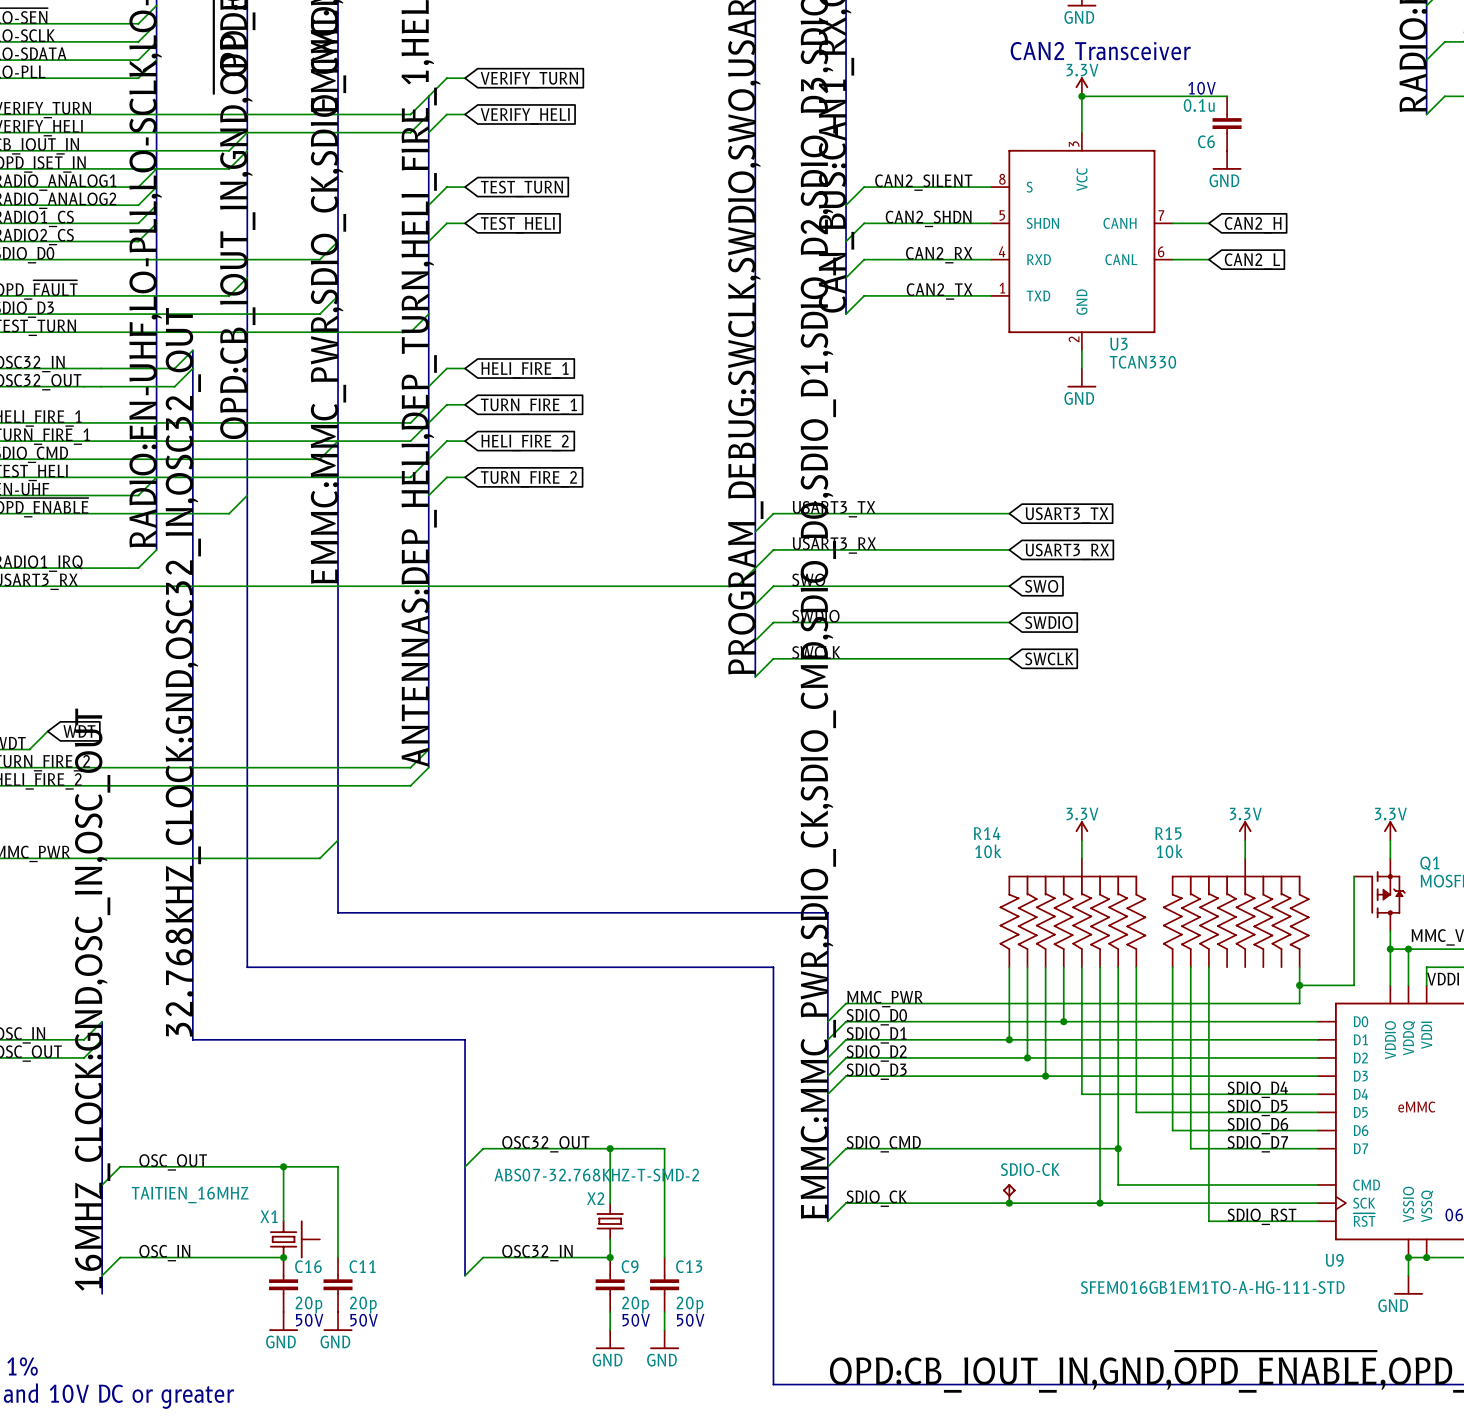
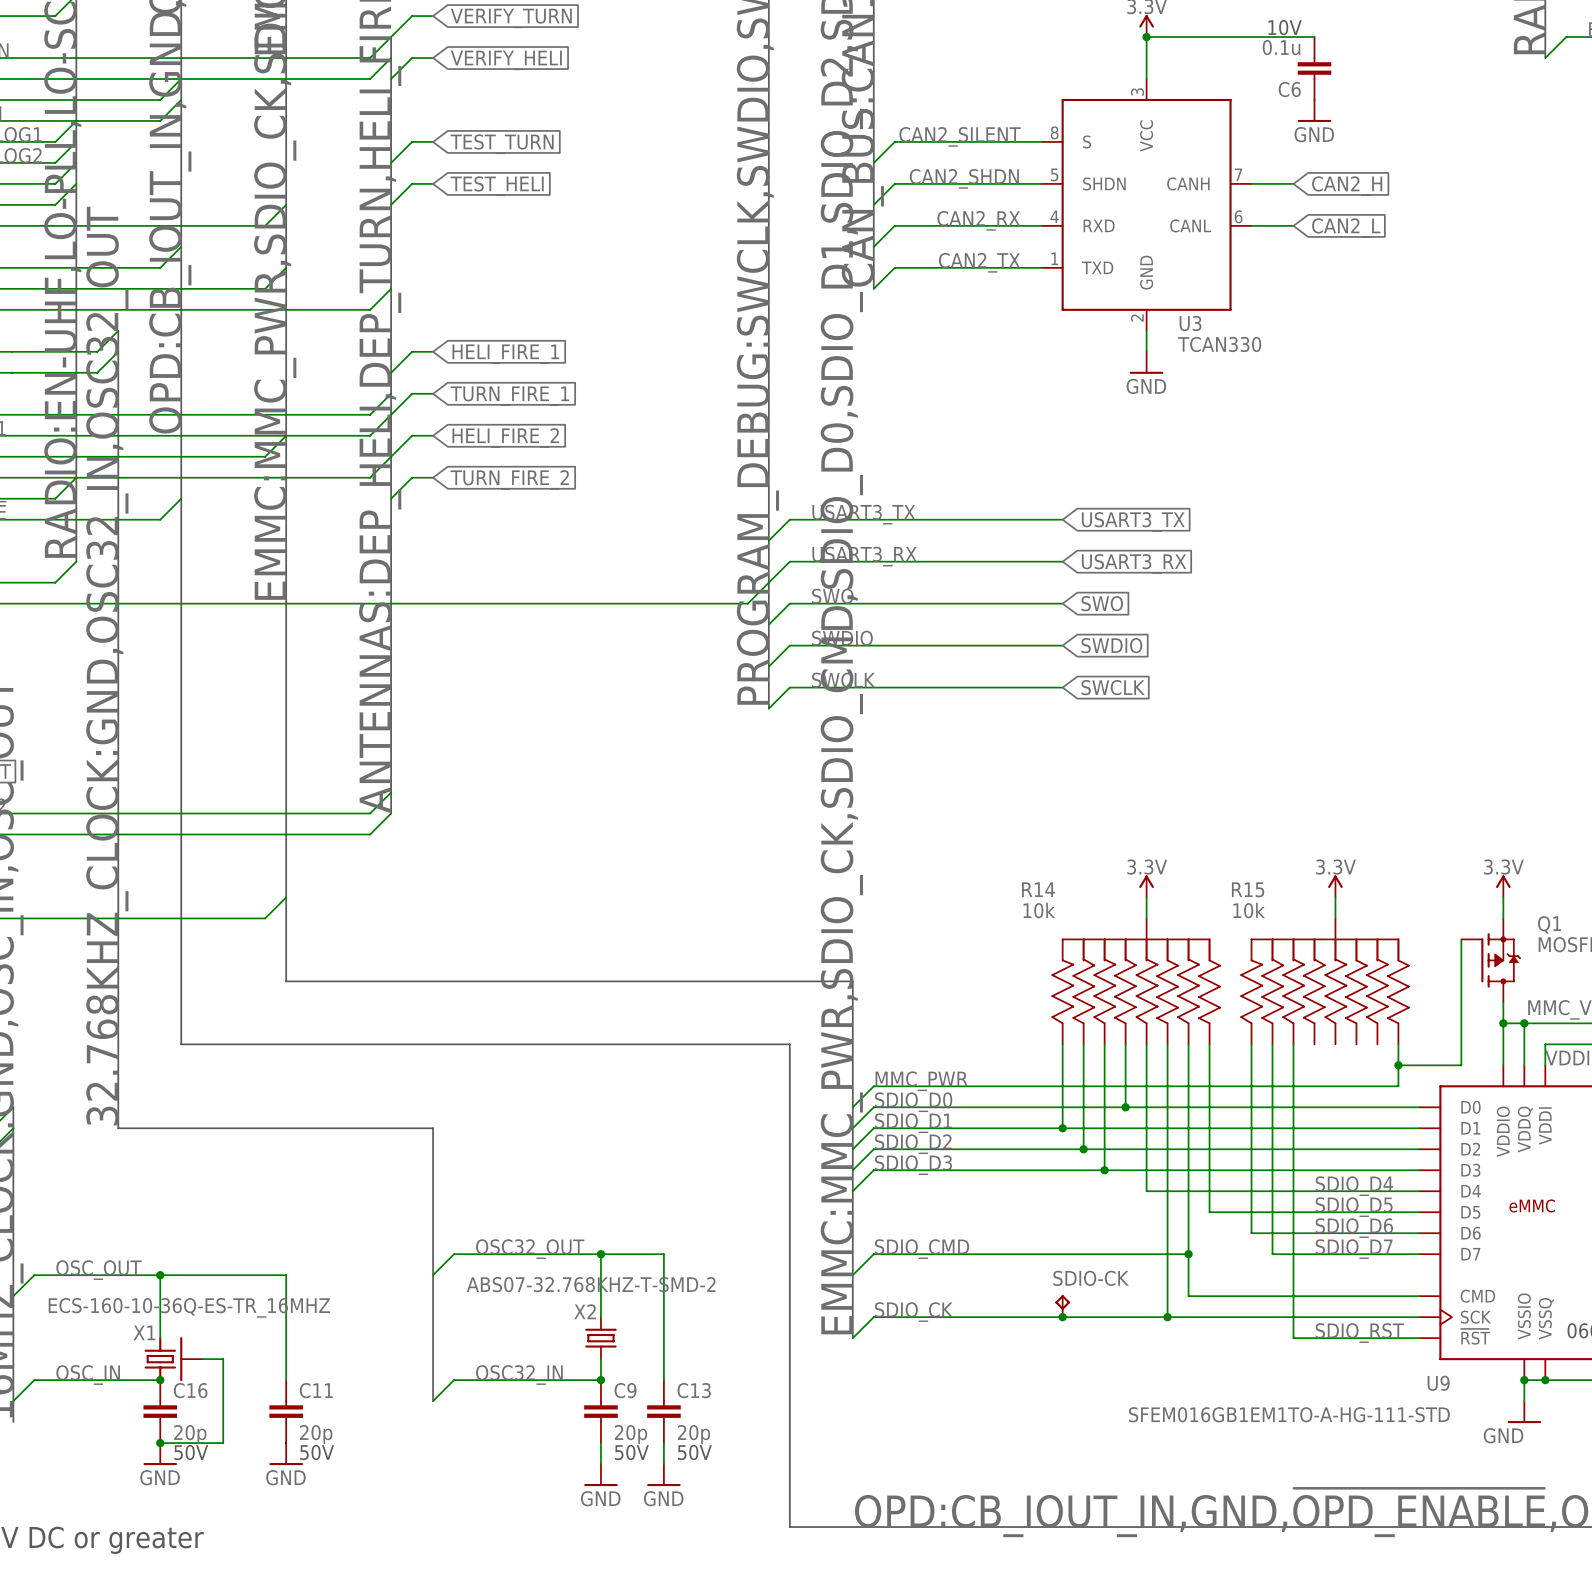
junction: none -> (160, 1275)
wire: (283, 1166) (283, 1221) -> (160, 1275) (160, 1338)
junction: (283, 1166) -> none
X1 value: TAITIEN_16MHZ (190, 1195) -> ECS-160-10-36Q-ES-TR_16MHZ (189, 1307)
wire: none -> (202, 1359) (223, 1359) (223, 1443) (160, 1443)
X1 position: (294, 1239) -> (173, 1359)
wire: (229, 1257) (283, 1257) -> none
junction: none -> (160, 1380)
junction: (283, 1257) -> none
C16 position: (283, 1284) -> (160, 1411)
junction: none -> (160, 1443)
power symbol position: GND (283, 1321) -> GND (160, 1454)

